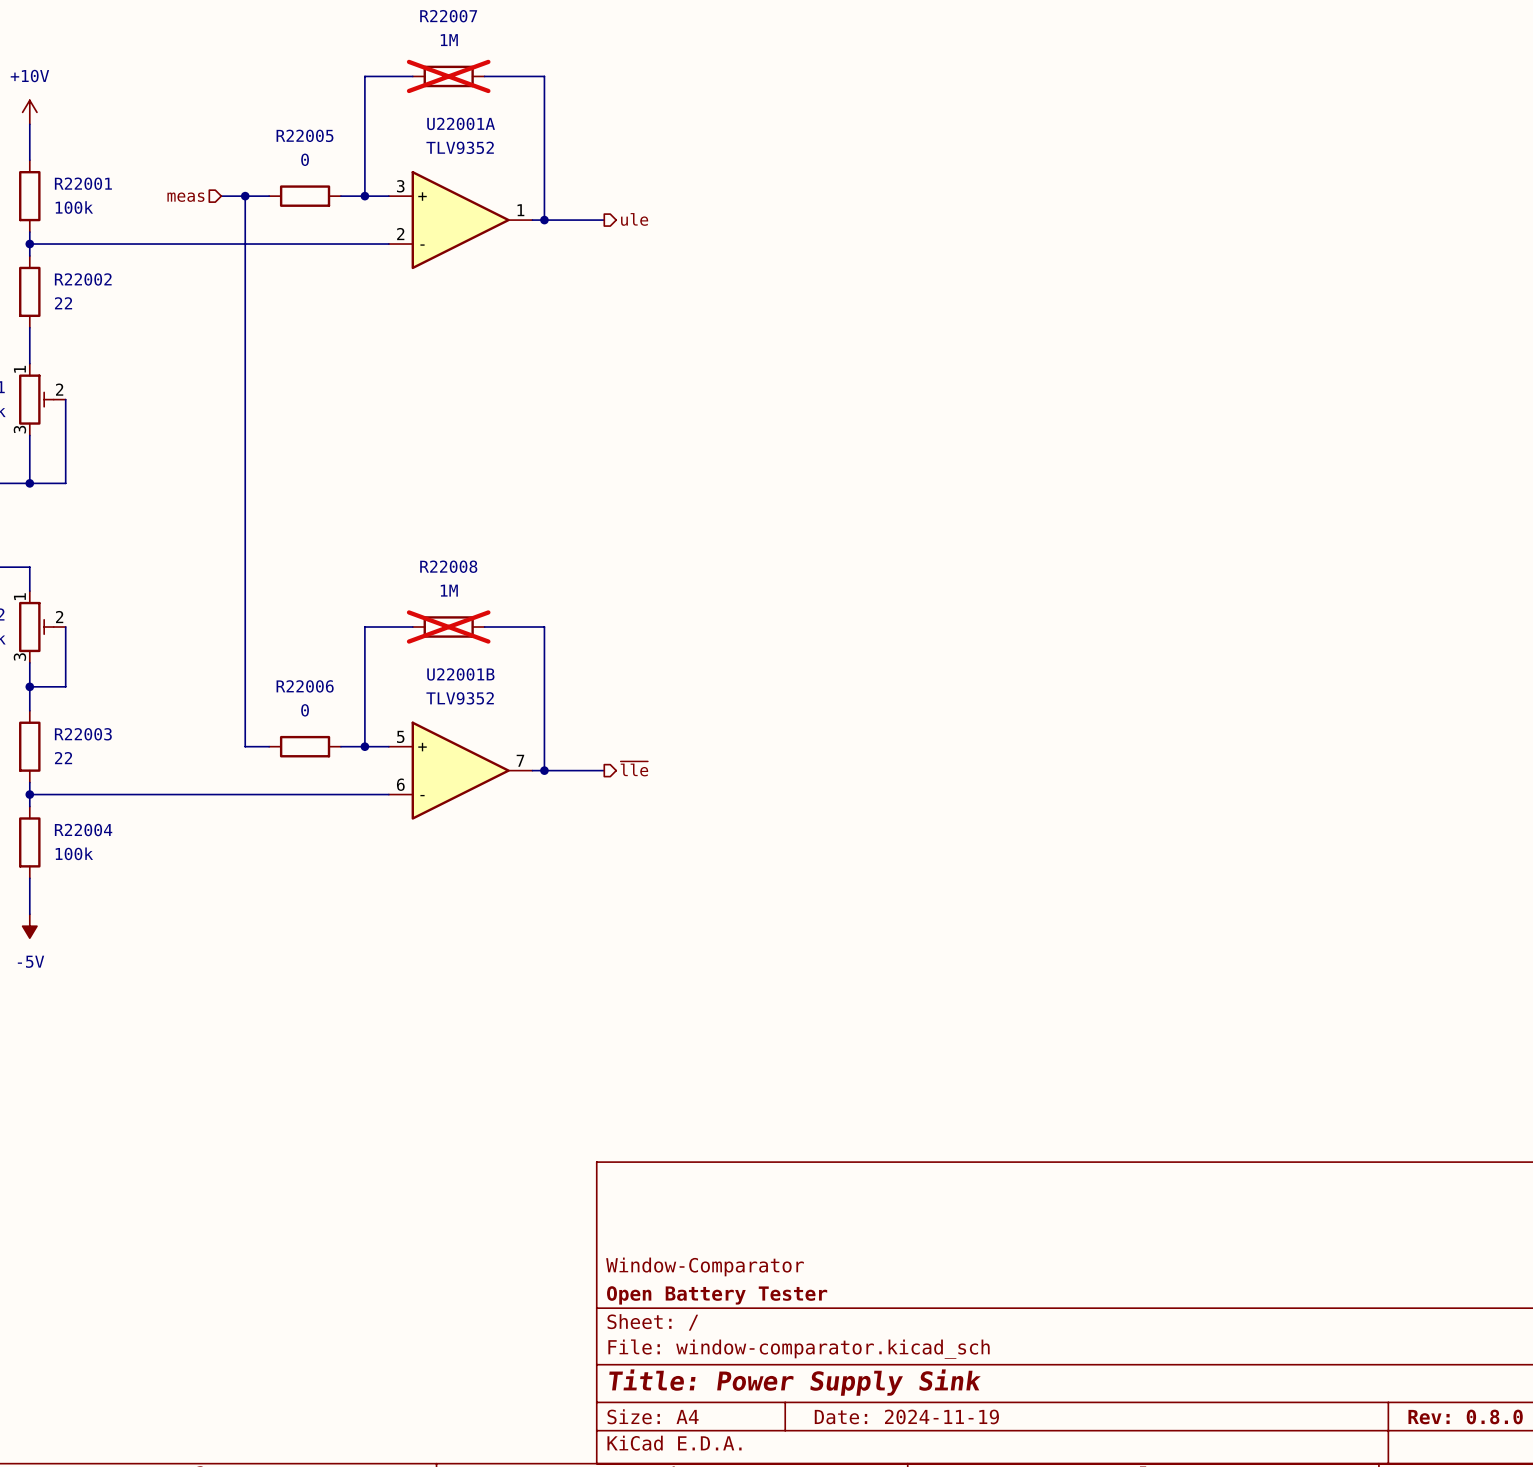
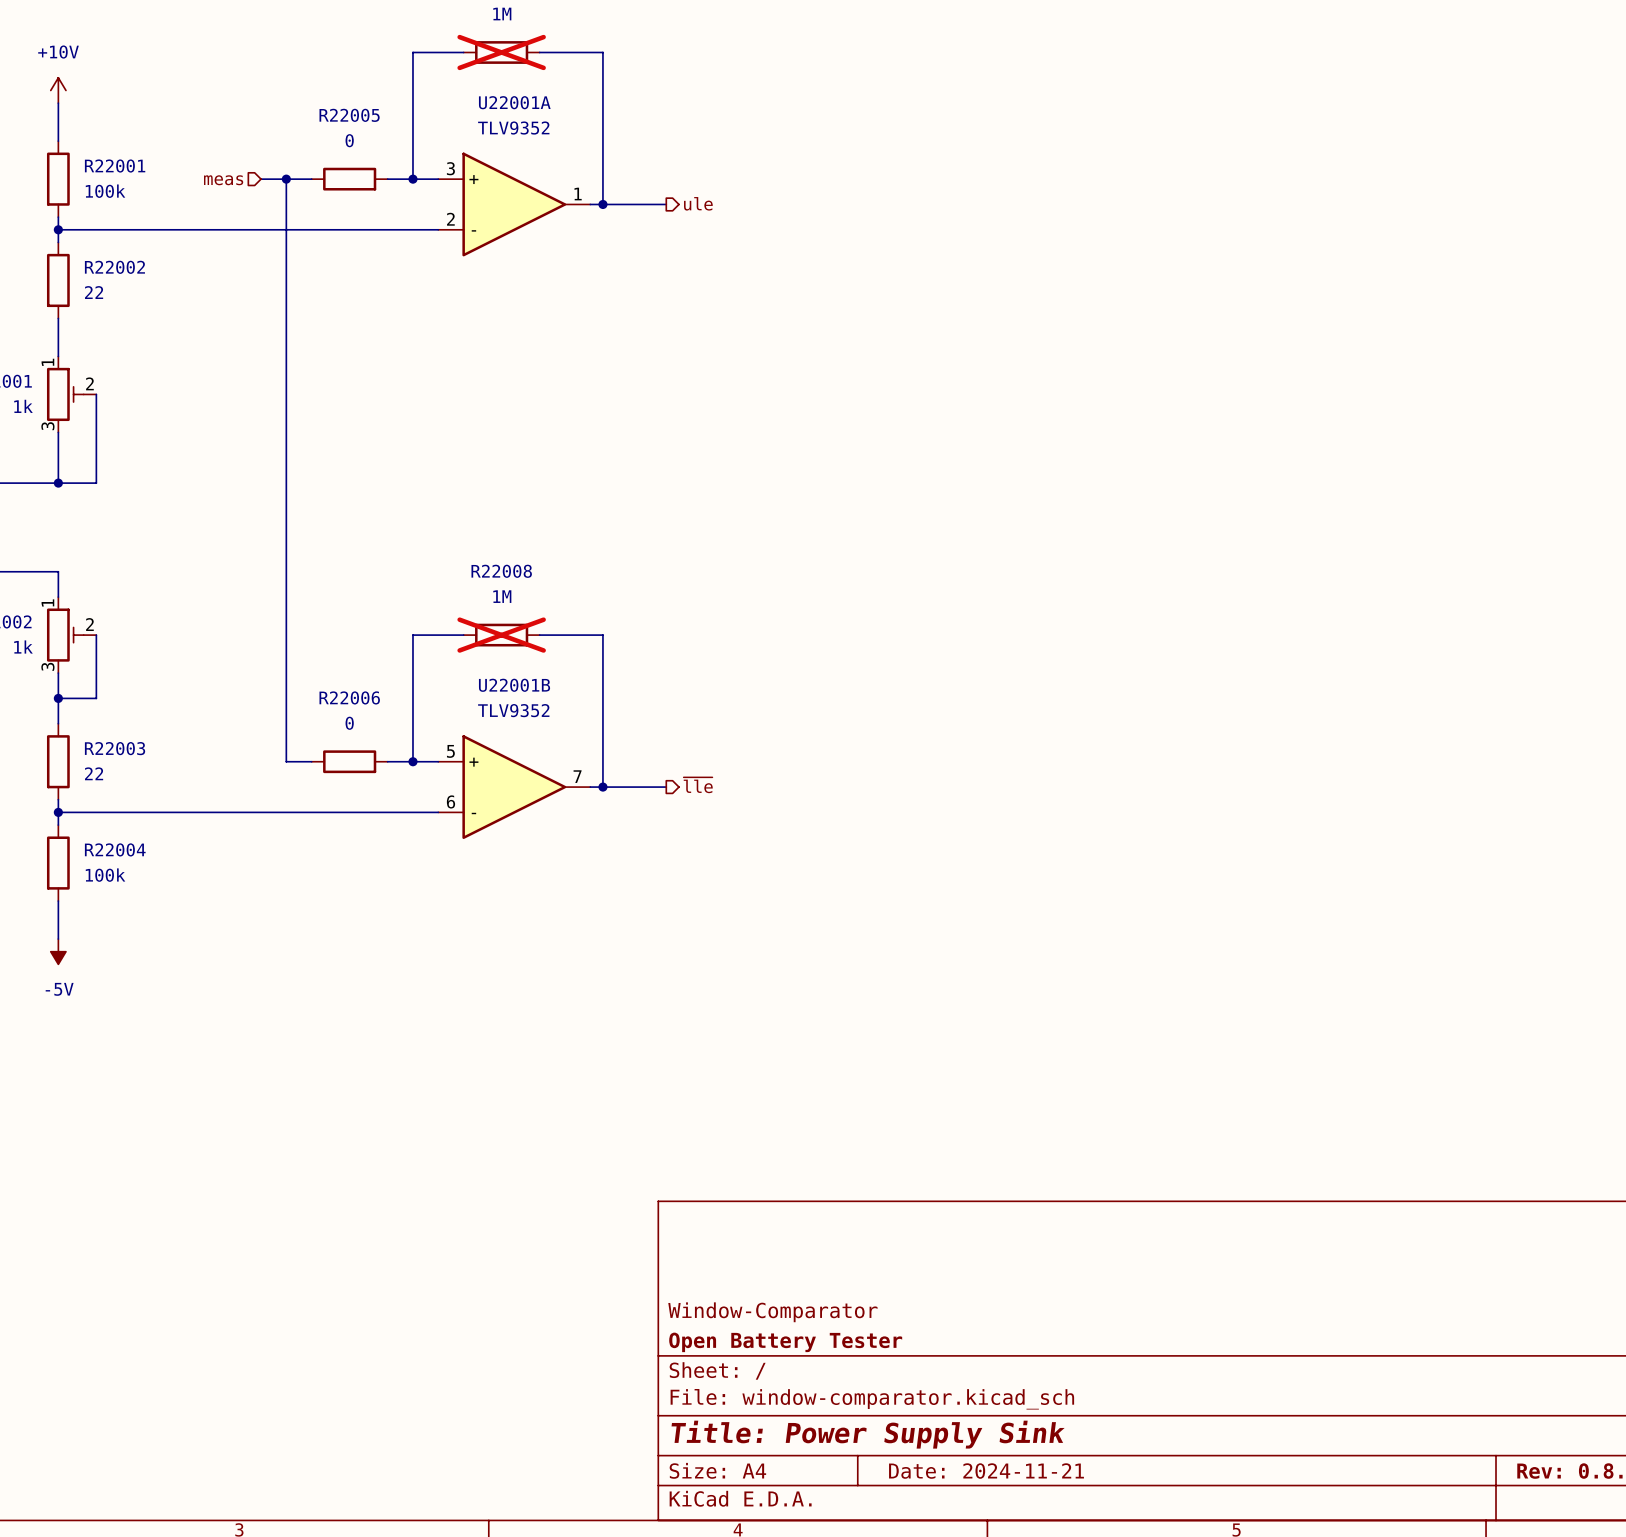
title block: Date: 2024-11-19 (906, 1416) -> Date: 2024-11-21 (986, 1471)

